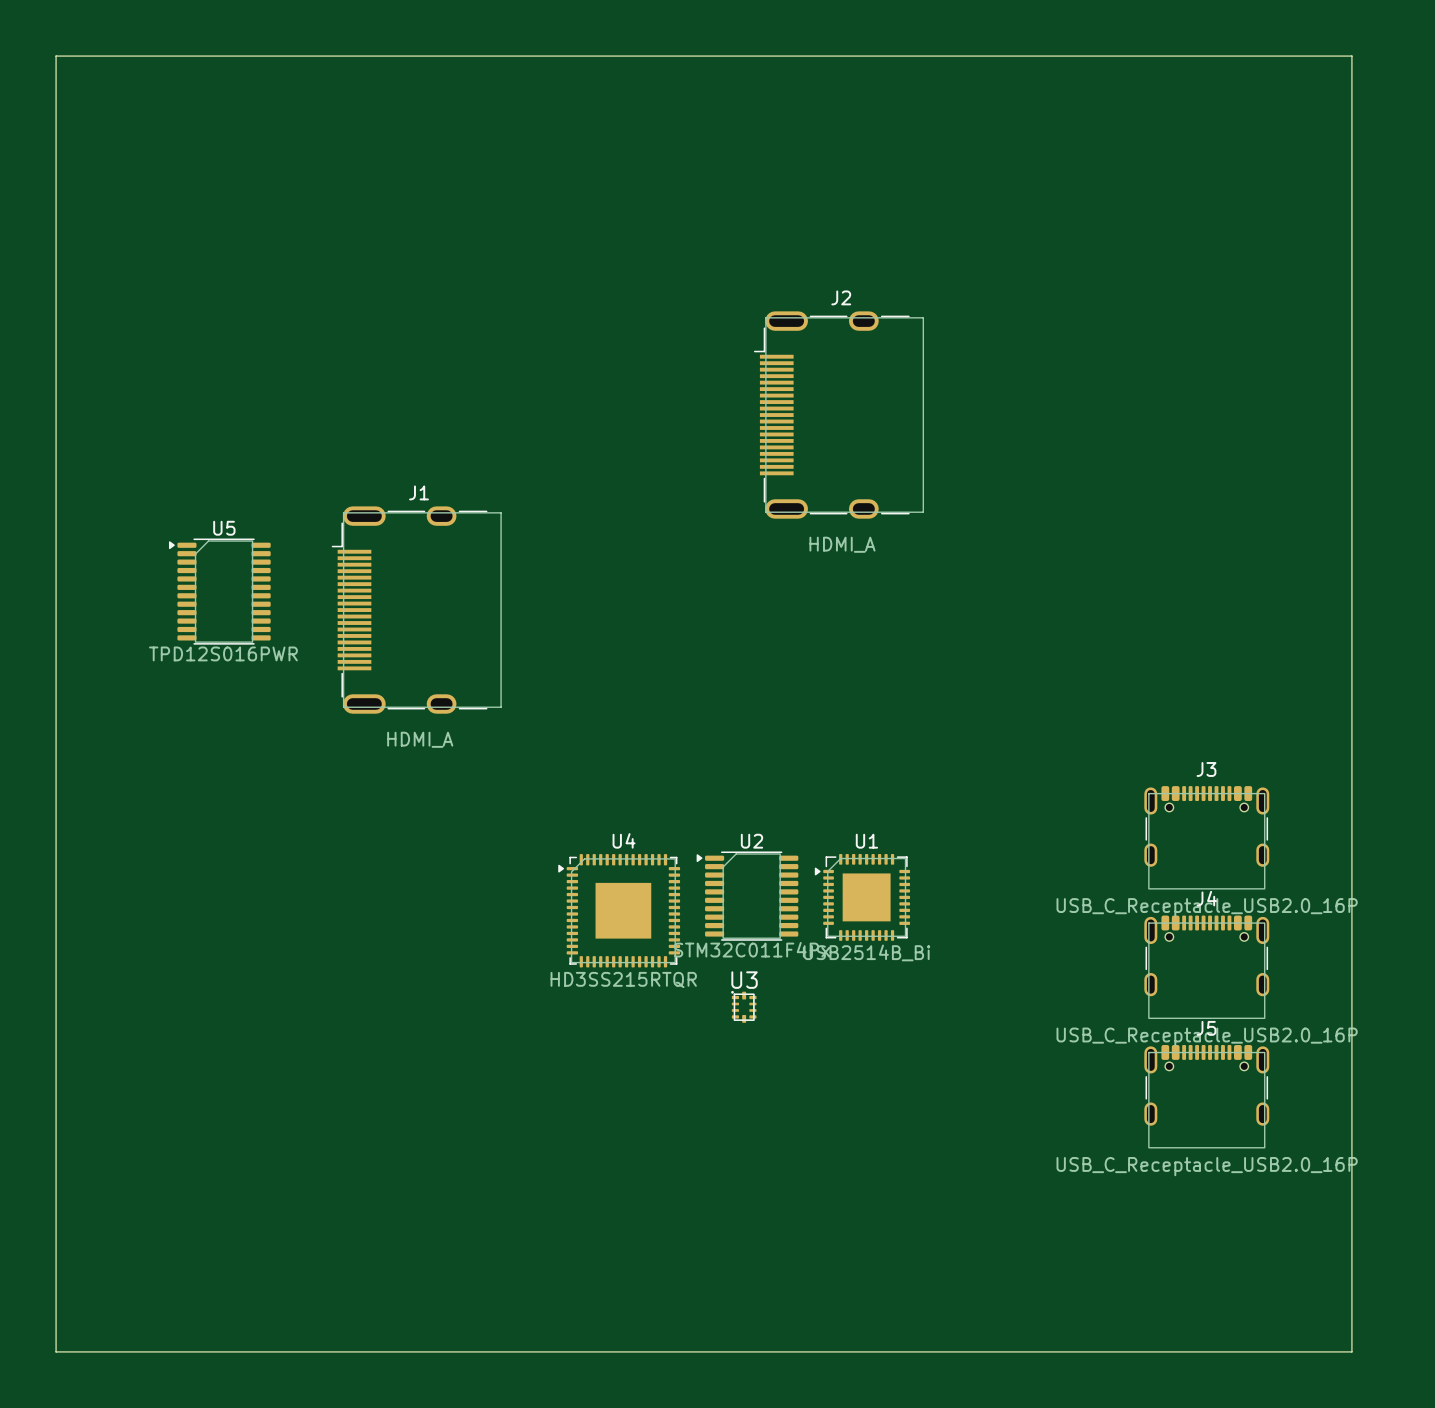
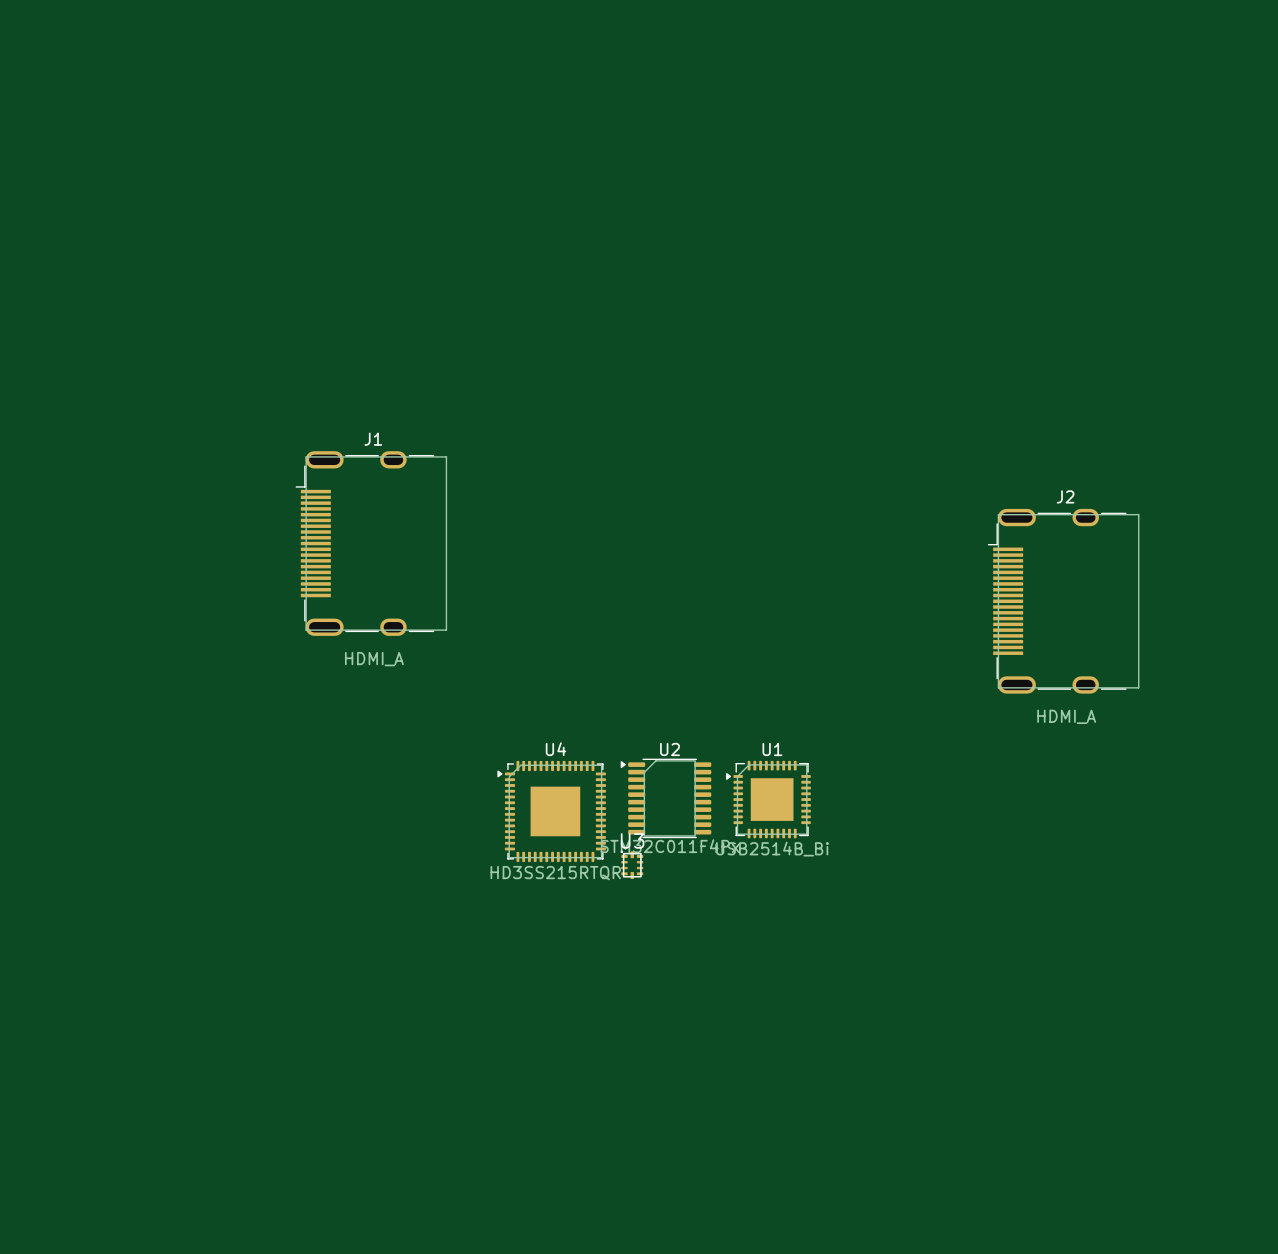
board edge: (56, 56) (1351, 56) (1351, 1351) (56, 1351) (56, 56) -> none
J2 position: (838, 415) -> (1063, 601)
U5: TPD12S016PWR (219, 591) -> none
J3: USB_C_Receptacle_USB2.0_16P (1206, 837) -> none
J4: USB_C_Receptacle_USB2.0_16P (1206, 967) -> none
U3 position: (743, 1006) -> (631, 864)
J5: USB_C_Receptacle_USB2.0_16P (1206, 1096) -> none

